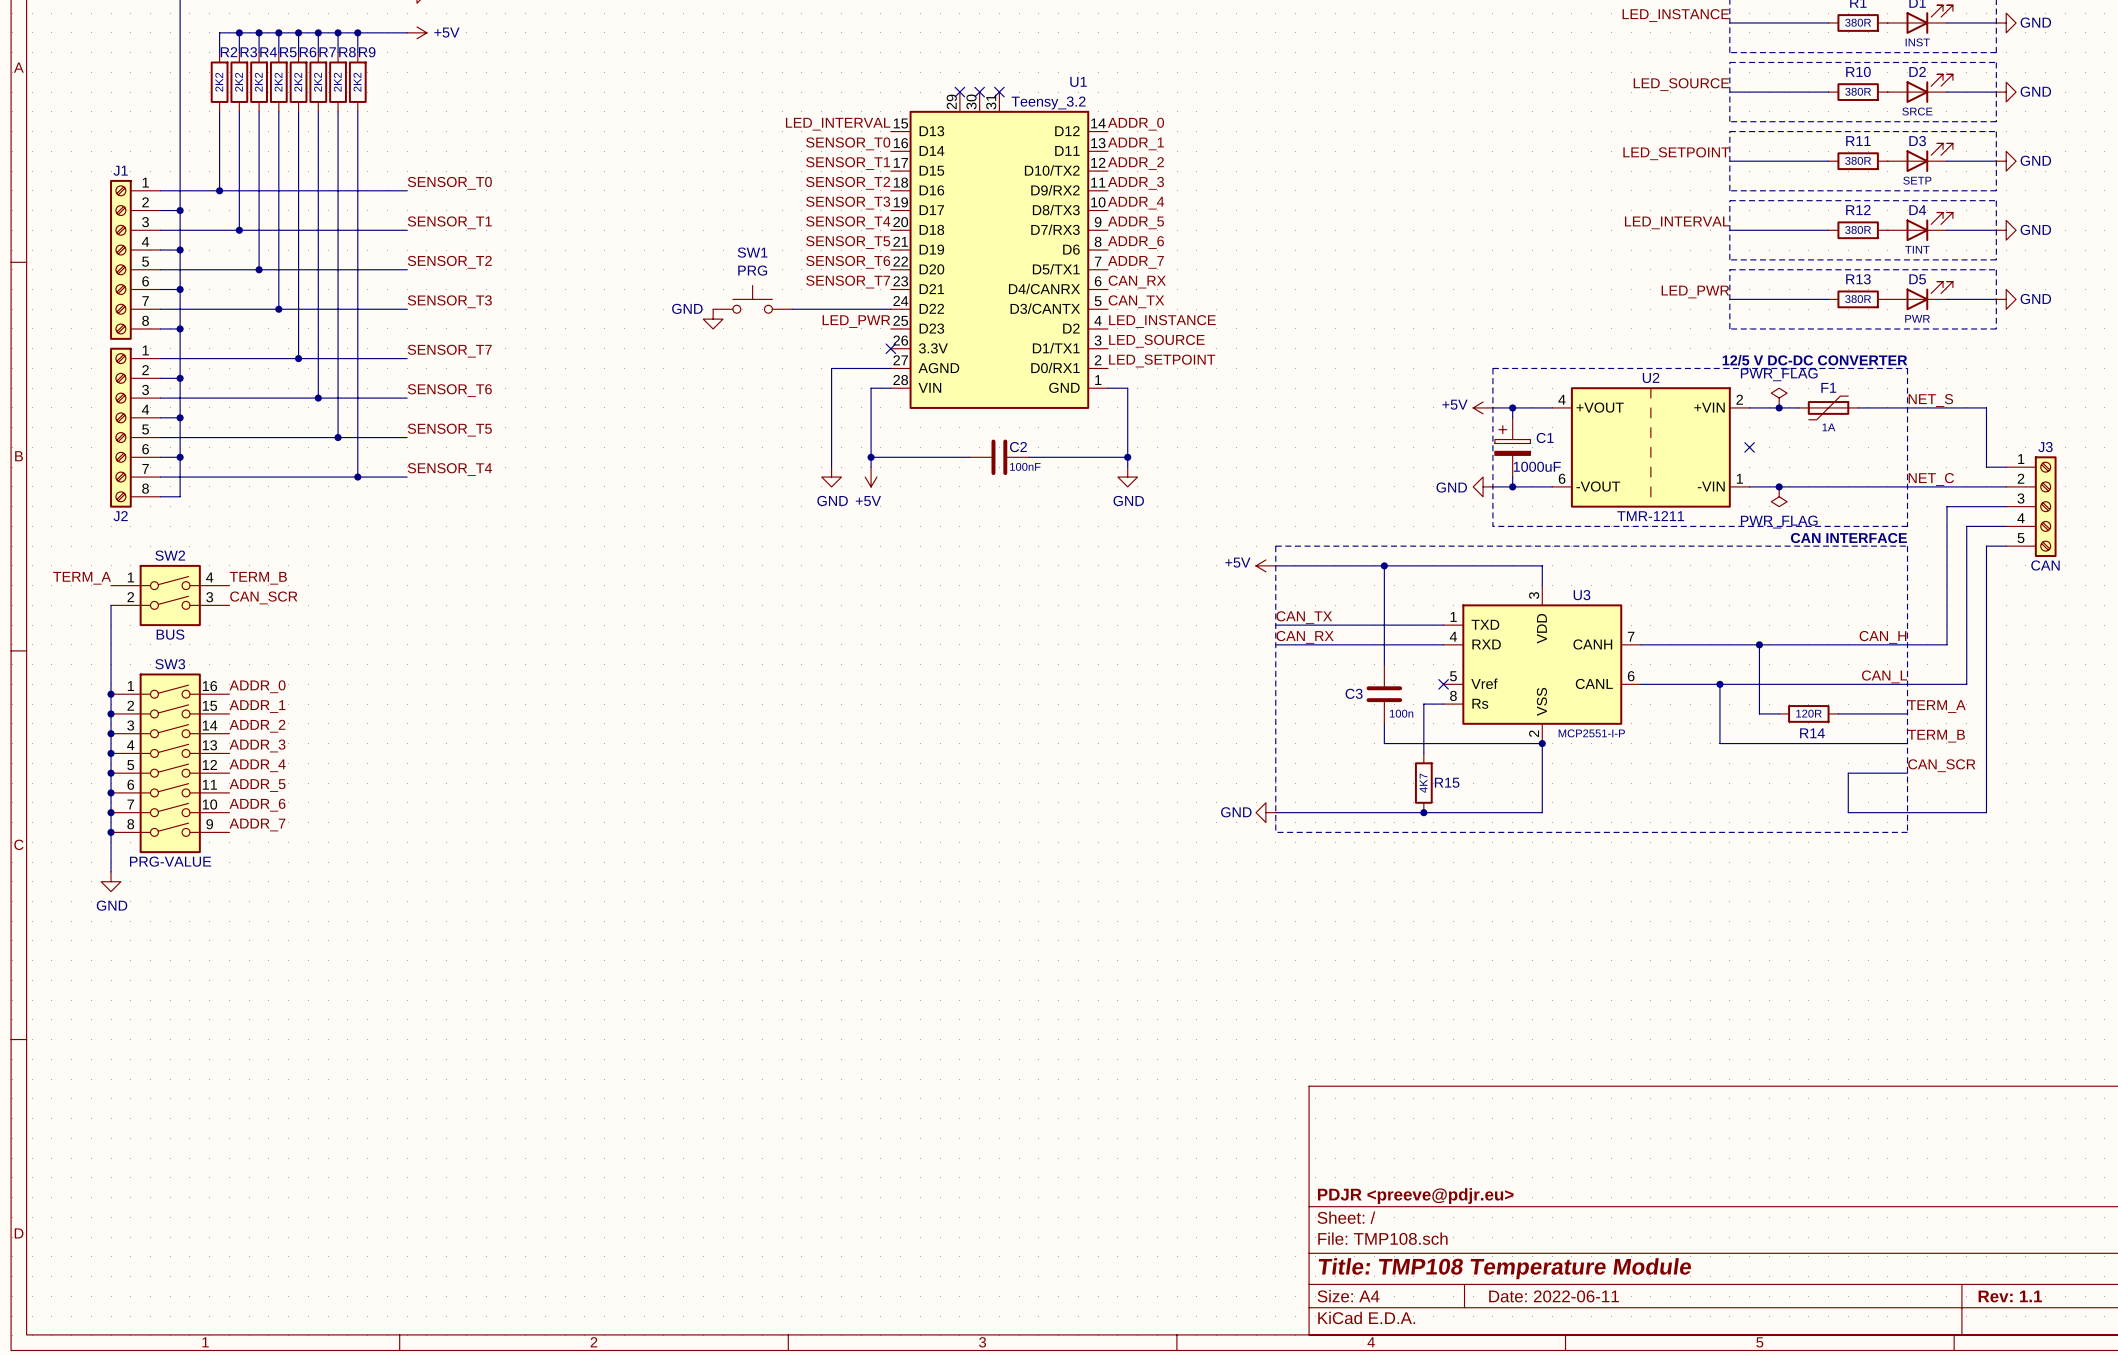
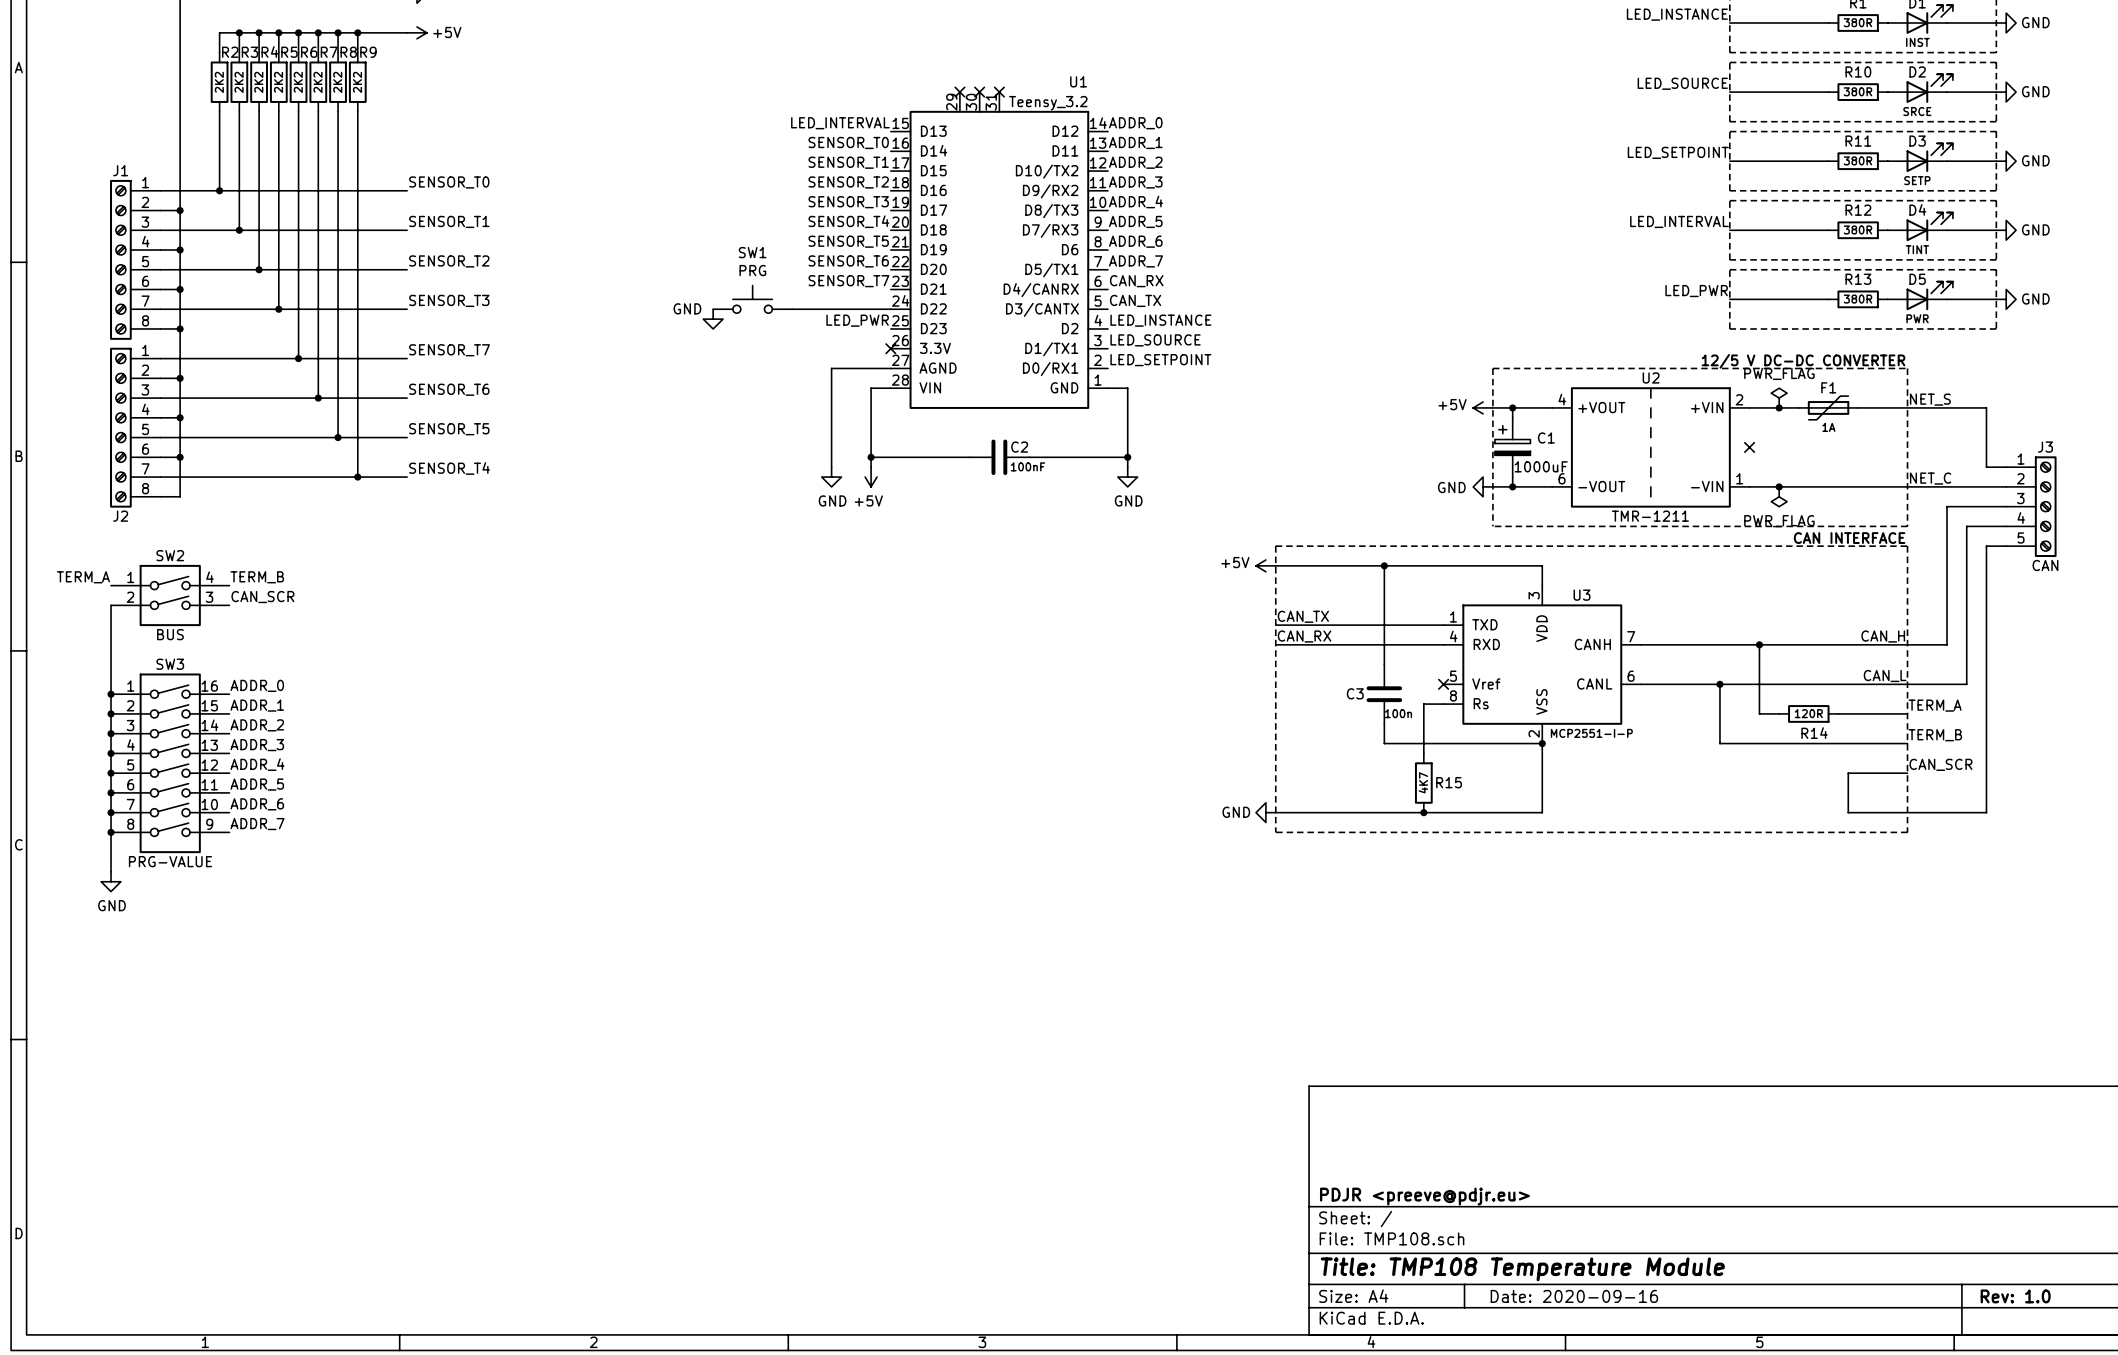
title block: Date: 2022-06-11 (1554, 1296) -> Date: 2020-09-16 (1574, 1296)
title block: Rev: 1.1 (2010, 1296) -> Rev: 1.0 (2015, 1296)

